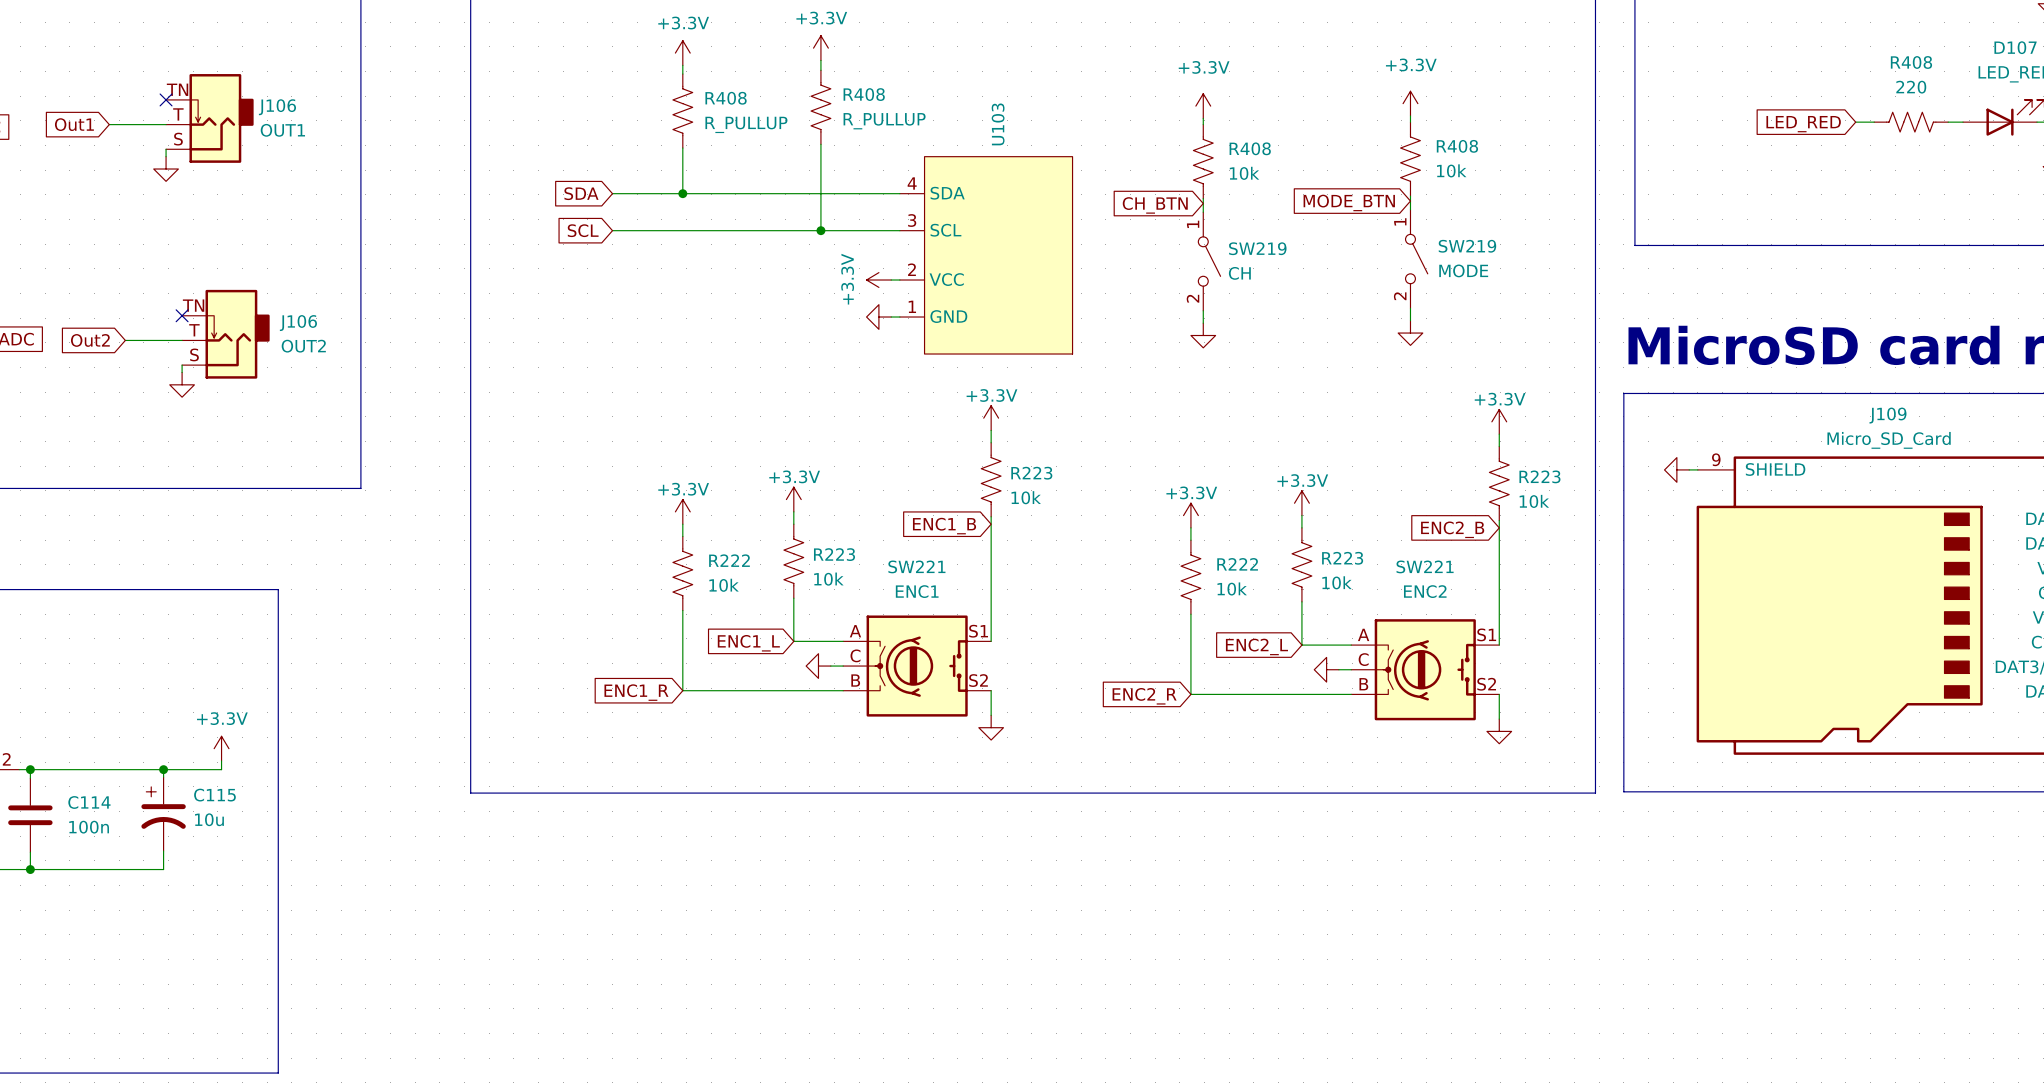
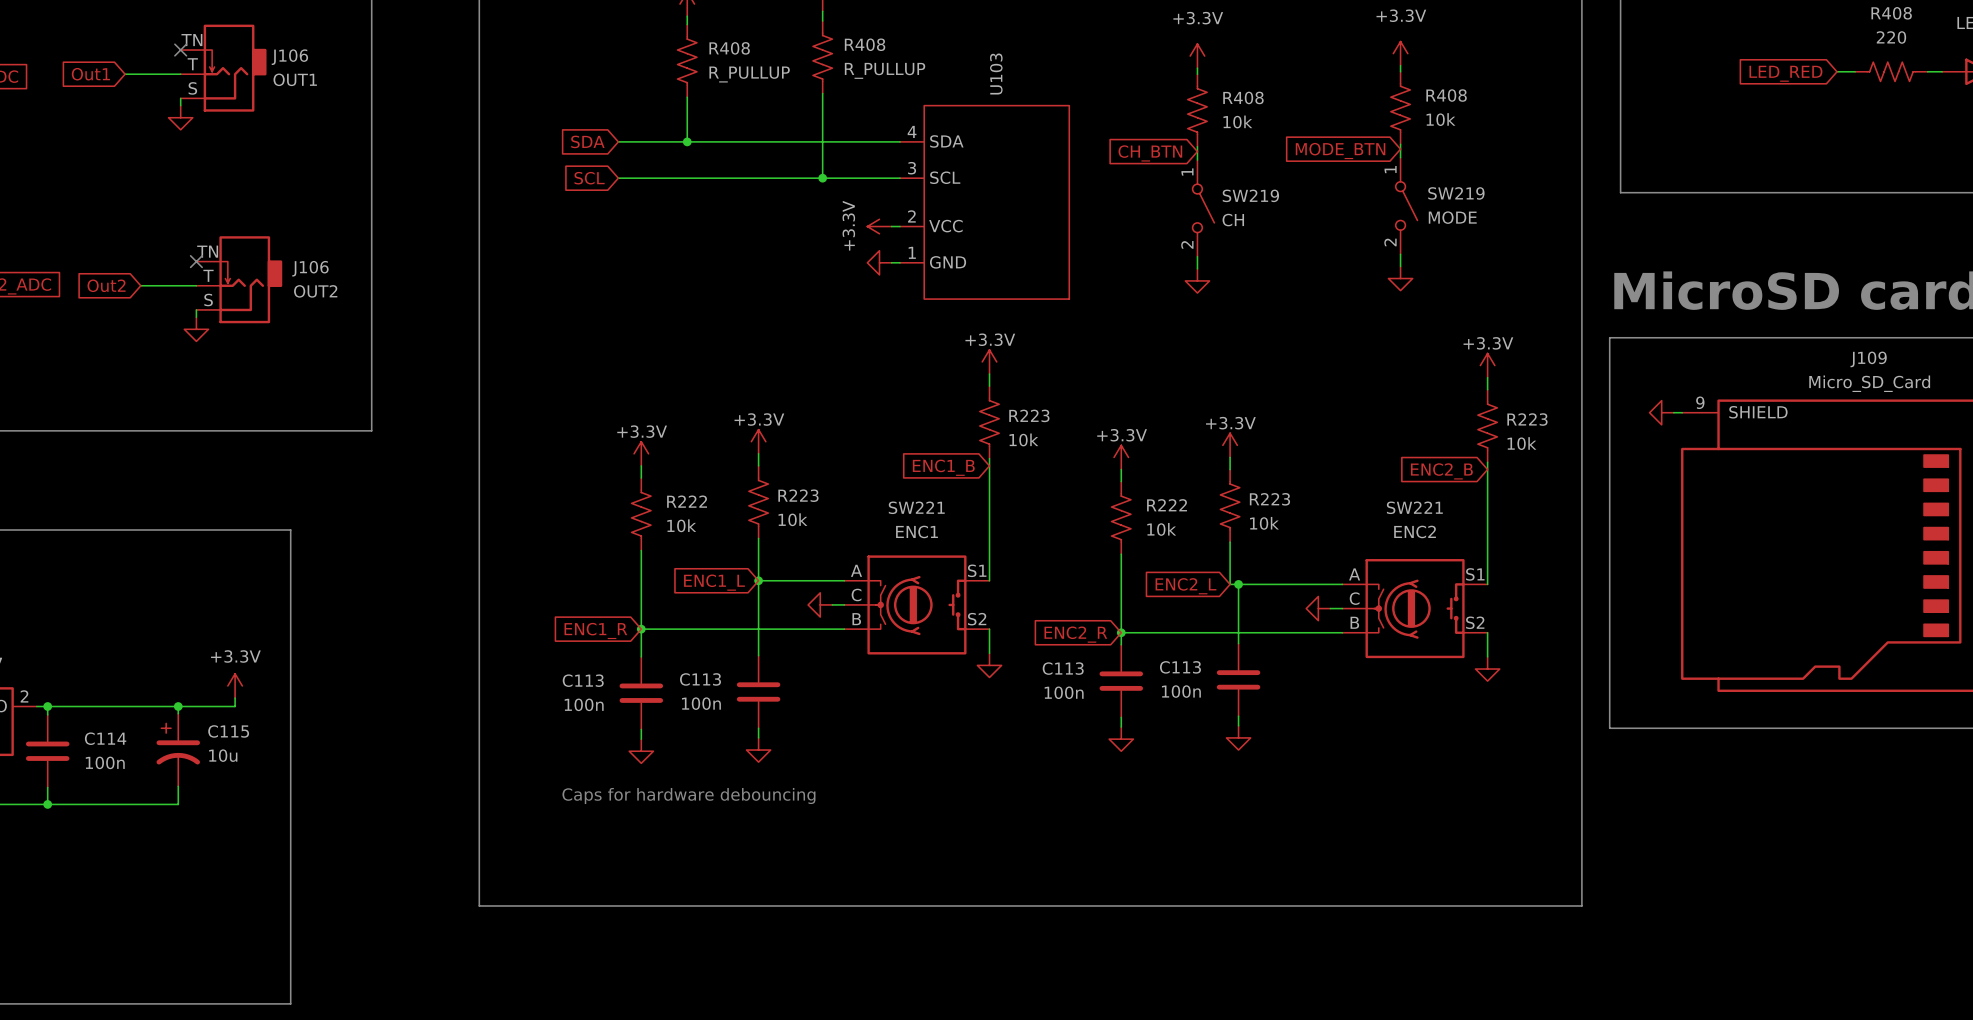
power symbol: none -> +3.3V (758, 441)
power symbol: +3.3V (793, 499) -> none
power symbol: none -> +3.3V (1230, 445)
power symbol: +3.3V (1301, 503) -> none
power symbol: none -> +3.3V (641, 453)
power symbol: +3.3V (682, 511) -> none
wire: (793, 511) (793, 524) -> (758, 453) (758, 465)
power symbol: none -> +3.3V (1121, 457)
power symbol: +3.3V (1190, 515) -> none
wire: (1301, 515) (1301, 527) -> (1230, 457) (1230, 469)
wire: (682, 524) (682, 536) -> (641, 465) (641, 478)
wire: (1190, 527) (1190, 540) -> (1121, 469) (1121, 481)
R223 position: (793, 561) -> (758, 502)
R223 position: (1301, 564) -> (1230, 505)
R222 position: (682, 573) -> (641, 514)
R222 position: (1190, 577) -> (1121, 517)
wire: none -> (758, 538) (758, 655)
wire: (793, 598) (793, 641) -> (758, 580) (796, 580)
wire: (1301, 601) (1301, 645) -> (1230, 542) (1230, 584) (1294, 584)
wire: none -> (641, 550) (641, 656)
wire: (682, 610) (682, 690) -> (641, 629) (687, 629)
wire: none -> (1121, 554) (1121, 644)
wire: (1190, 614) (1190, 694) -> (1121, 632) (1185, 632)
junction: none -> (758, 580)
global label position: ENC1_L (748, 643) -> ENC1_L (714, 582)
wire: none -> (1238, 584) (1238, 643)
junction: none -> (1238, 584)
global label position: ENC2_L (1256, 646) -> ENC2_L (1185, 586)
junction: none -> (641, 629)
global label position: ENC1_R (636, 692) -> ENC1_R (595, 630)
junction: none -> (1121, 632)
global label position: ENC2_R (1144, 696) -> ENC2_R (1075, 634)
C113: none -> 100n (1238, 679)
C113: none -> 100n (1121, 681)
C113: none -> 100n (758, 692)
C113: none -> 100n (641, 693)
wire: none -> (1238, 716) (1238, 725)
wire: none -> (1121, 717) (1121, 727)
wire: none -> (758, 728) (758, 737)
line: (470, 793) (1595, 793) -> (479, 729) (479, 905) (1581, 905) (1581, 729)
wire: none -> (641, 729) (641, 739)
power symbol: none -> (1238, 737)
power symbol: none -> (1121, 739)
power symbol: none -> (758, 750)
power symbol: none -> (641, 751)
text: none -> Caps for hardware debouncing (688, 796)

